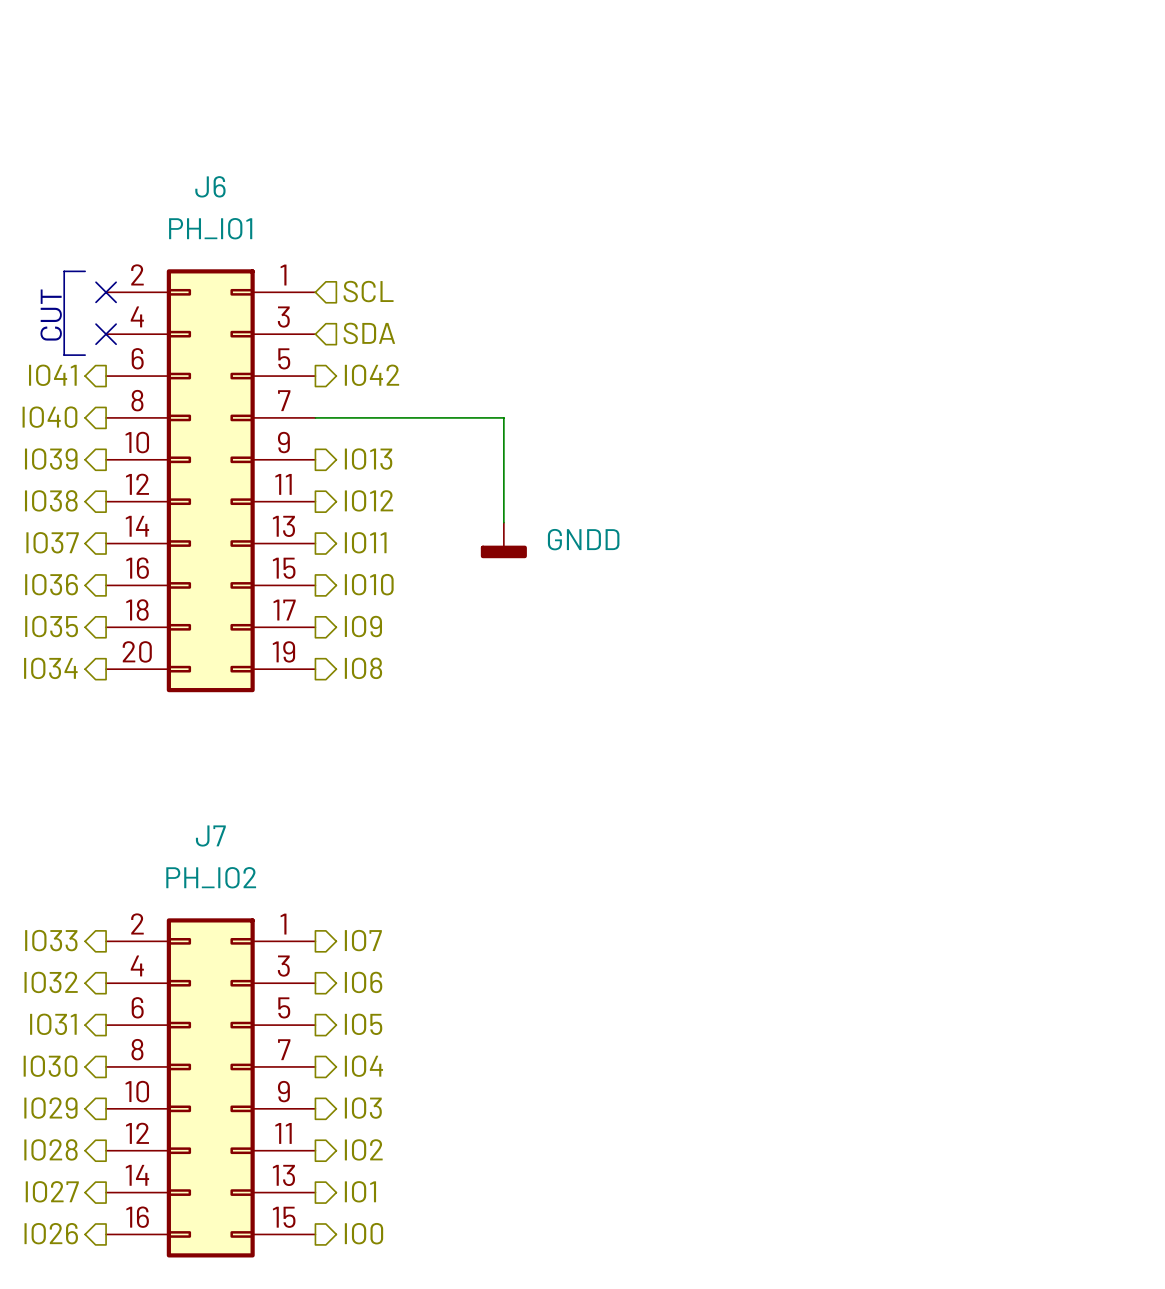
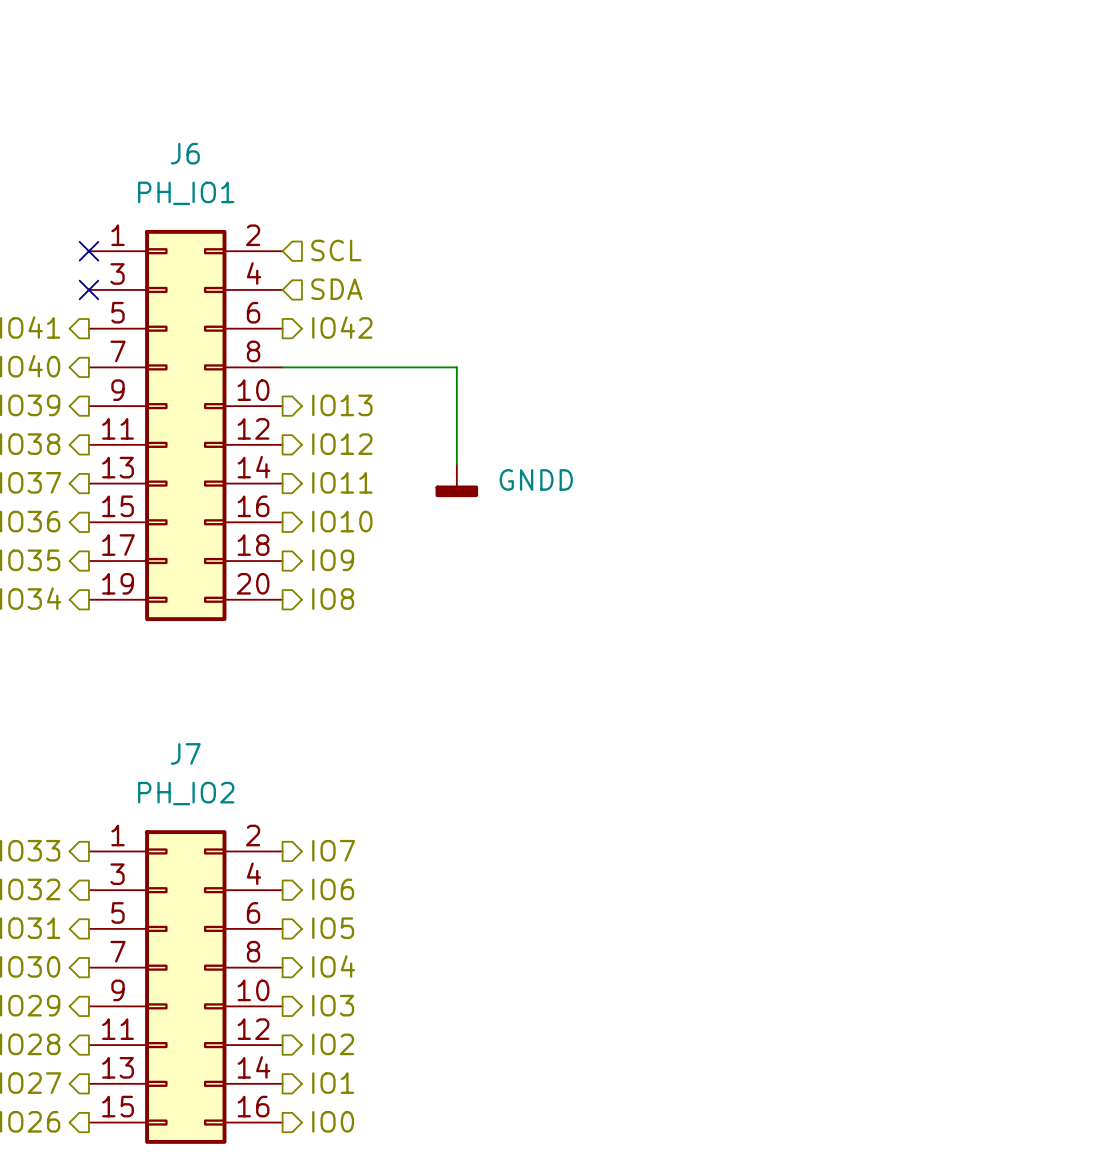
line: (85, 271) (64, 271) (64, 355) (85, 355) -> none
text: CUT (51, 315) -> none
J6 flip: as is (210, 480) -> left-right (185, 425)
J7 flip: as is (210, 1087) -> left-right (185, 987)

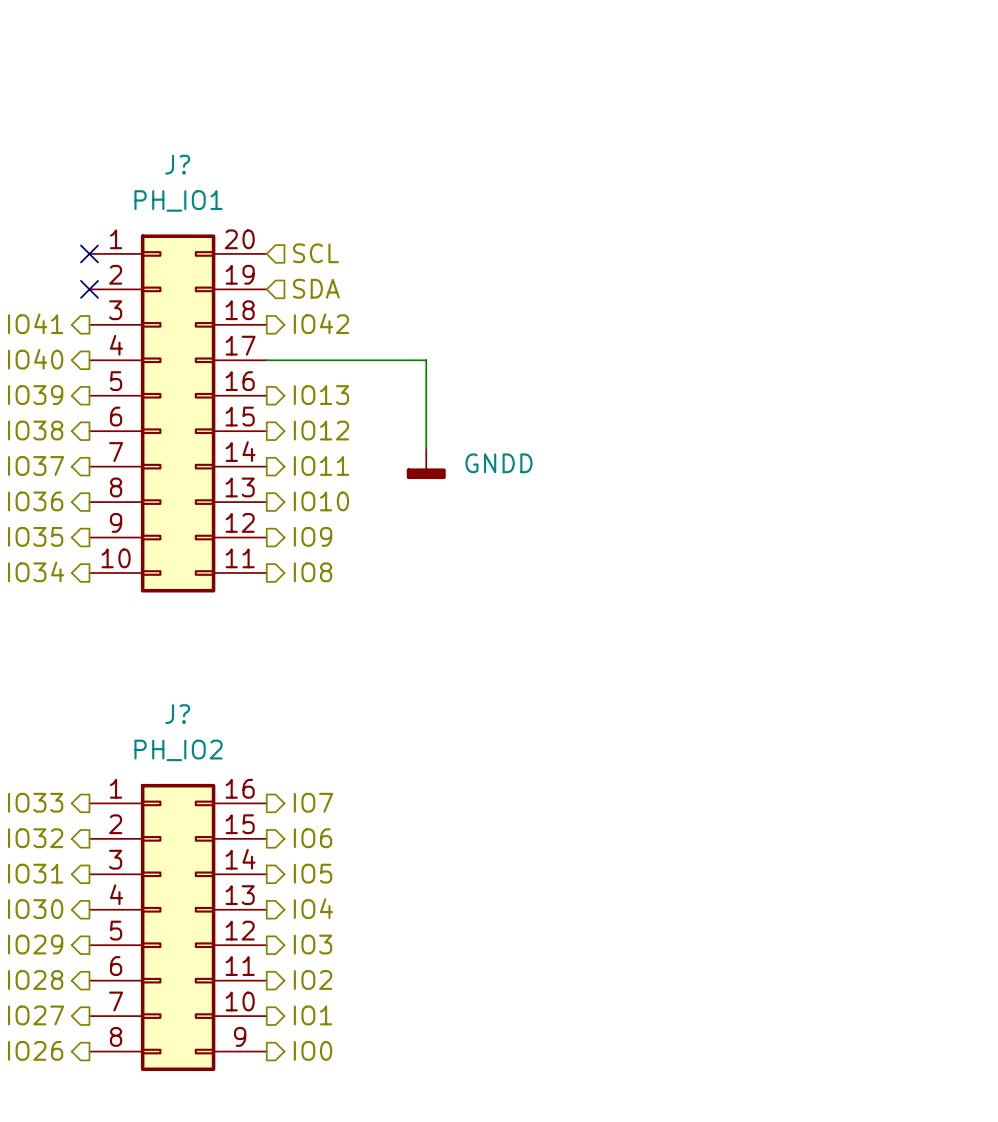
J6 name: J6 (185, 153) -> J? (177, 164)
J6 symbol: [88, 229, 283, 622] -> [89, 234, 267, 593]
J7 name: J7 (185, 753) -> J? (177, 714)
J7 symbol: [88, 830, 283, 1144] -> [89, 783, 267, 1072]

